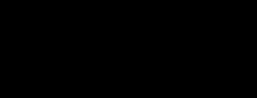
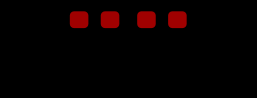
part: none -> (94, 19)
part: none -> (161, 19)

